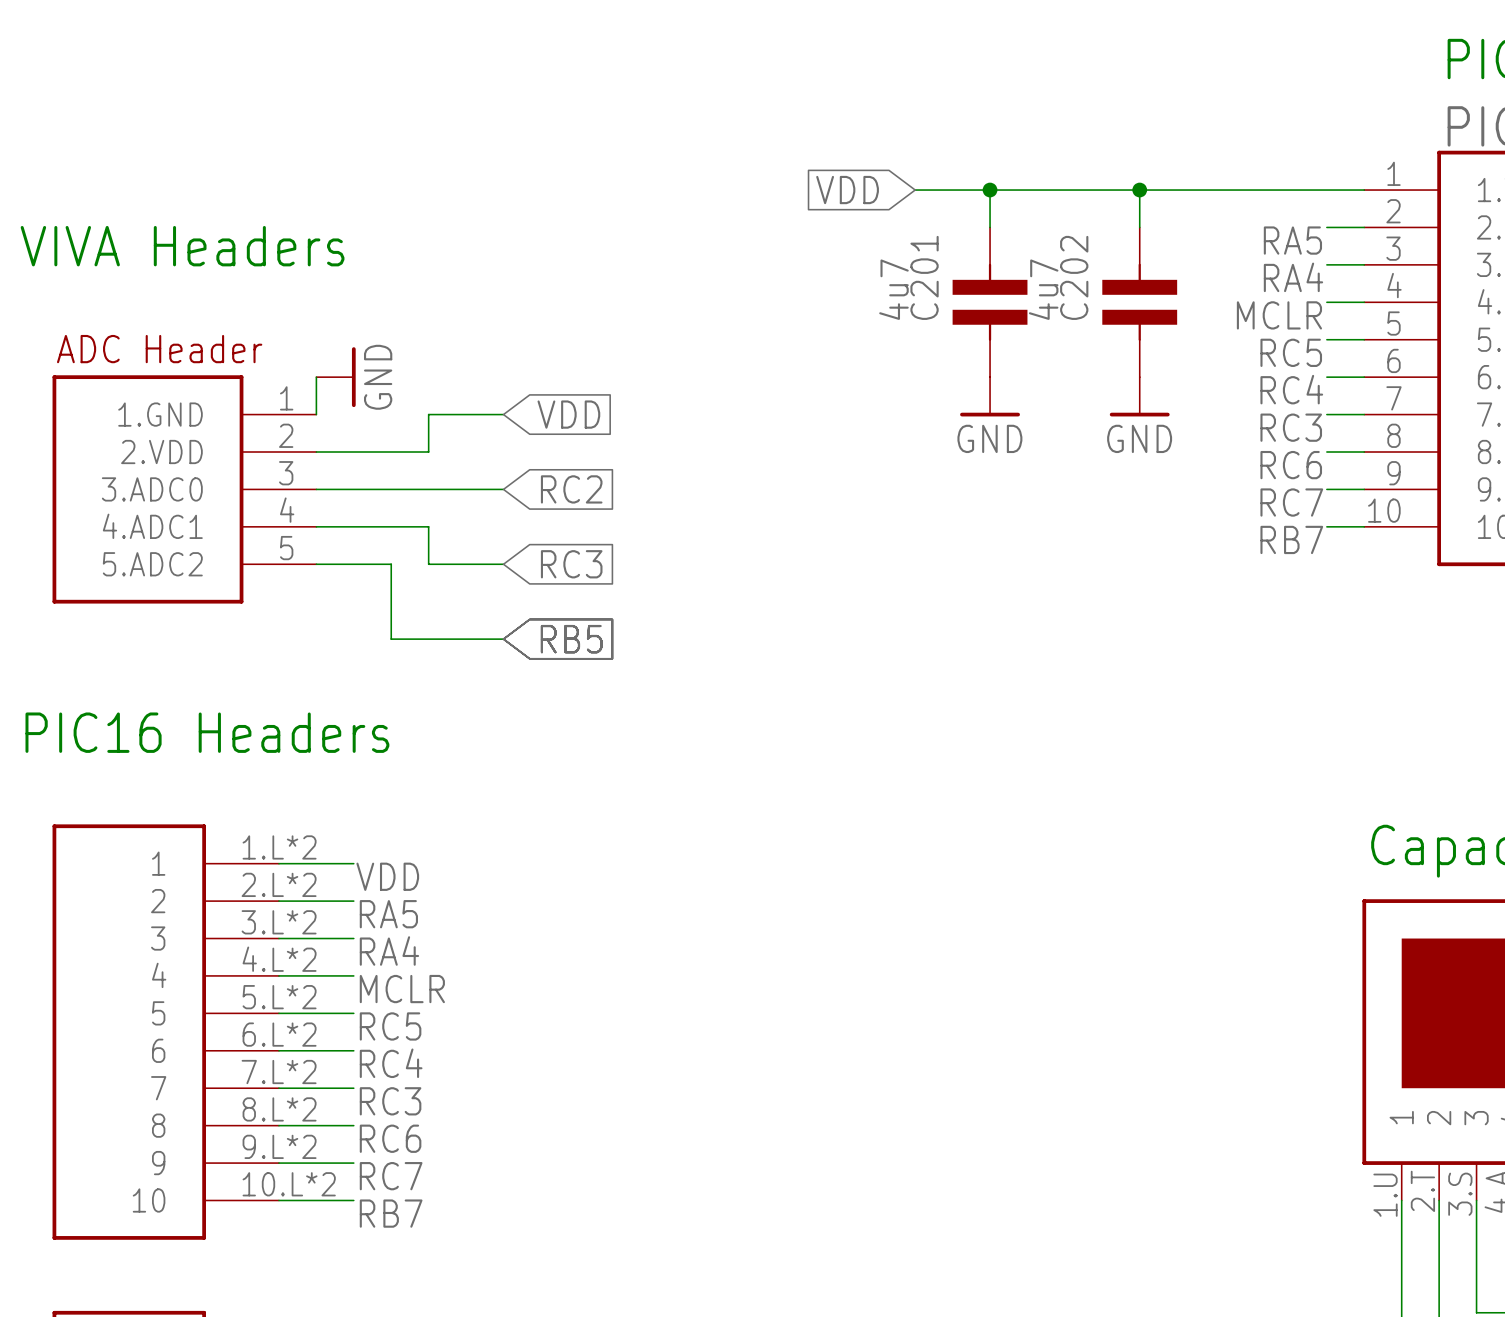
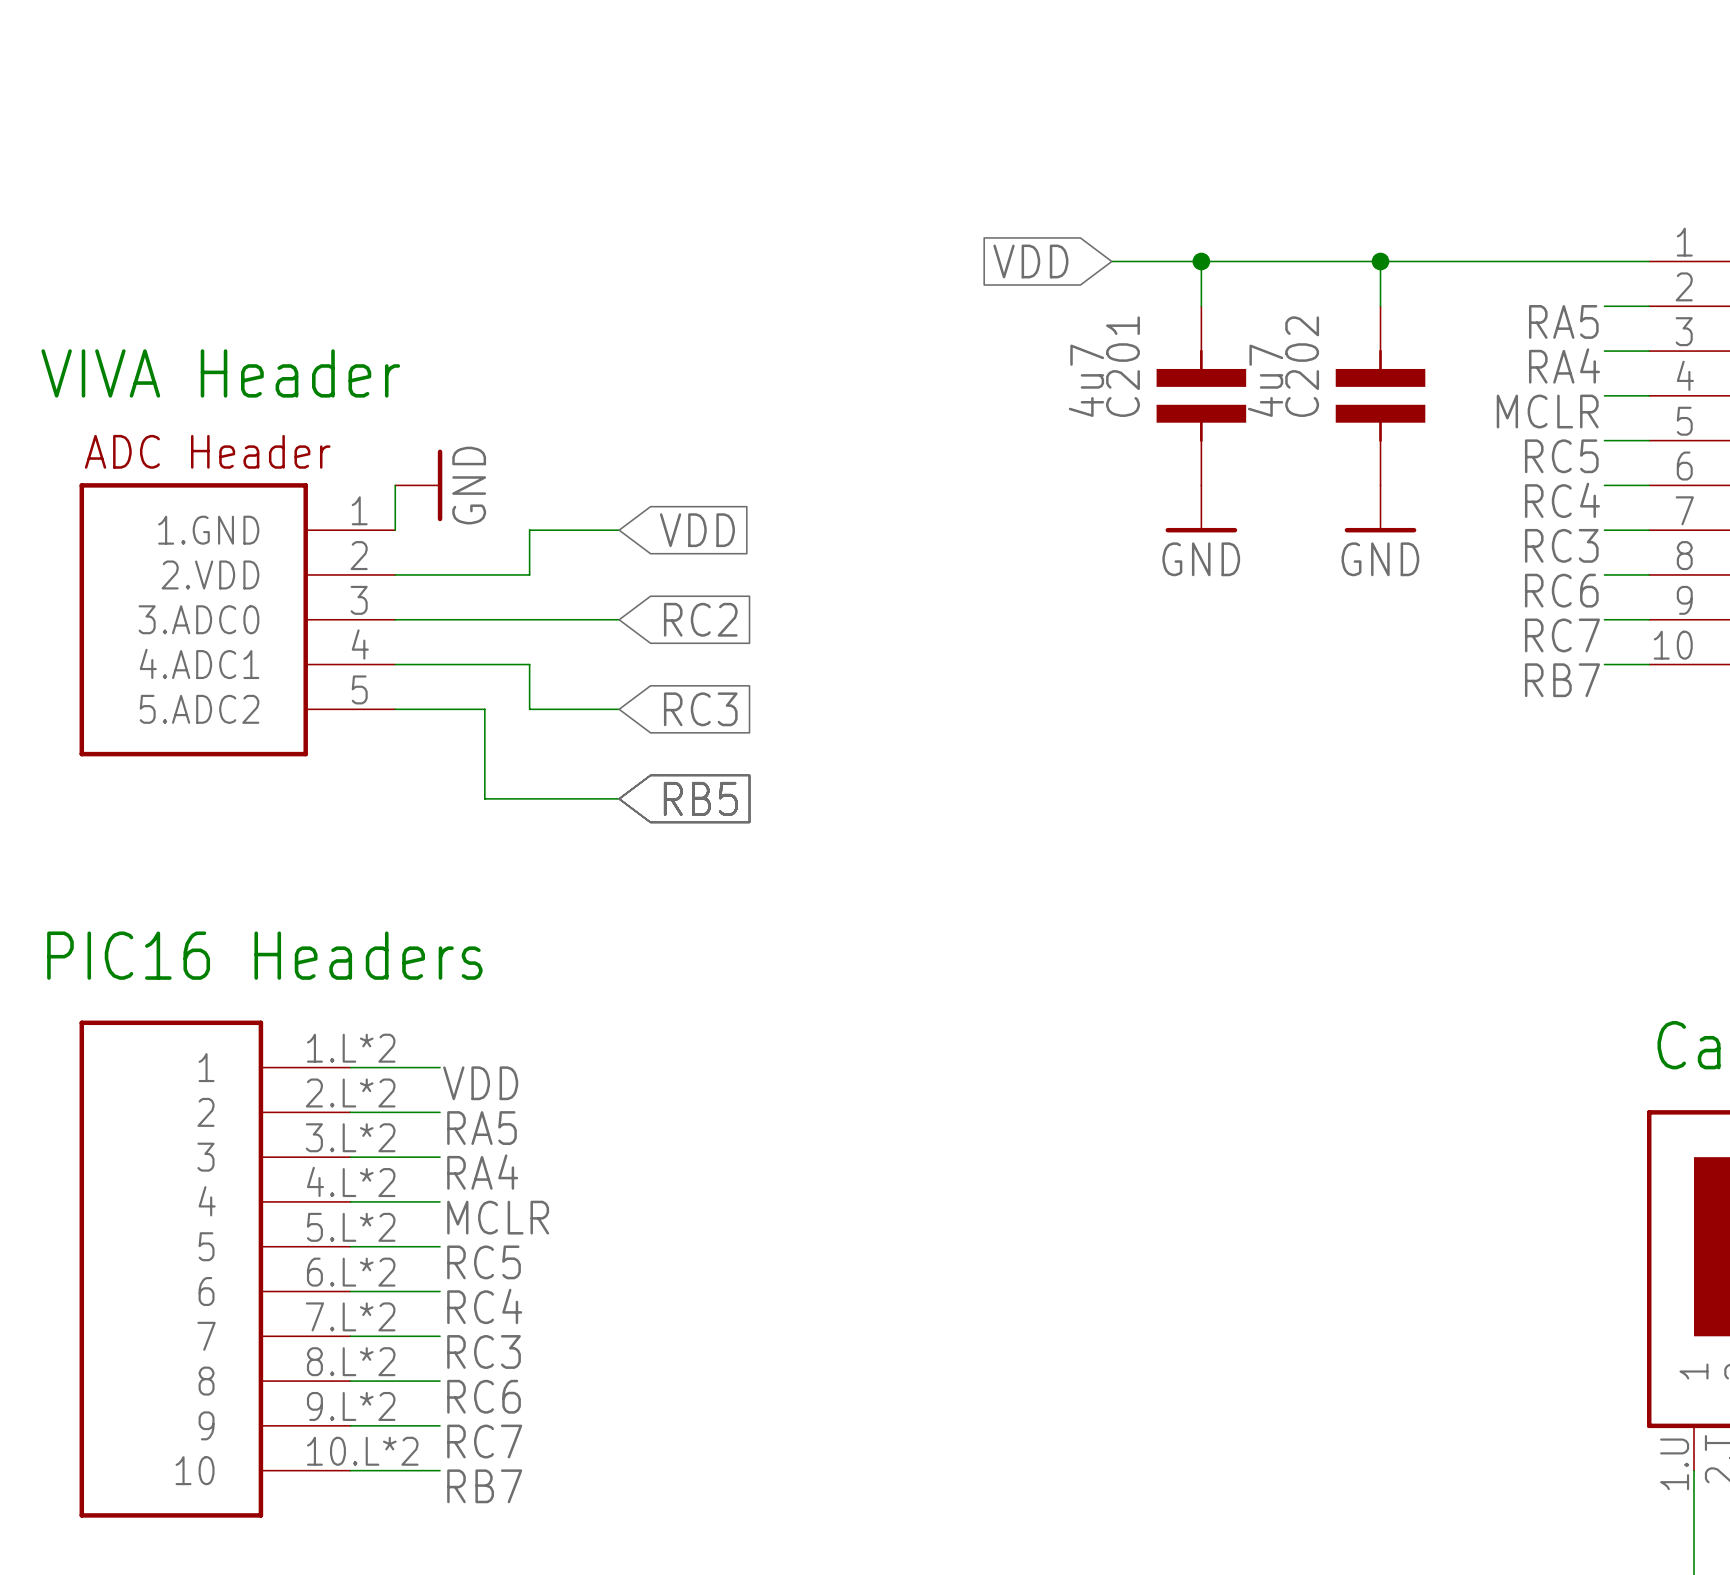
text: VIVA Headers (182, 246) -> VIVA Header (220, 373)
text position: PIC16 Headers (207, 732) -> PIC16 Headers (264, 955)

